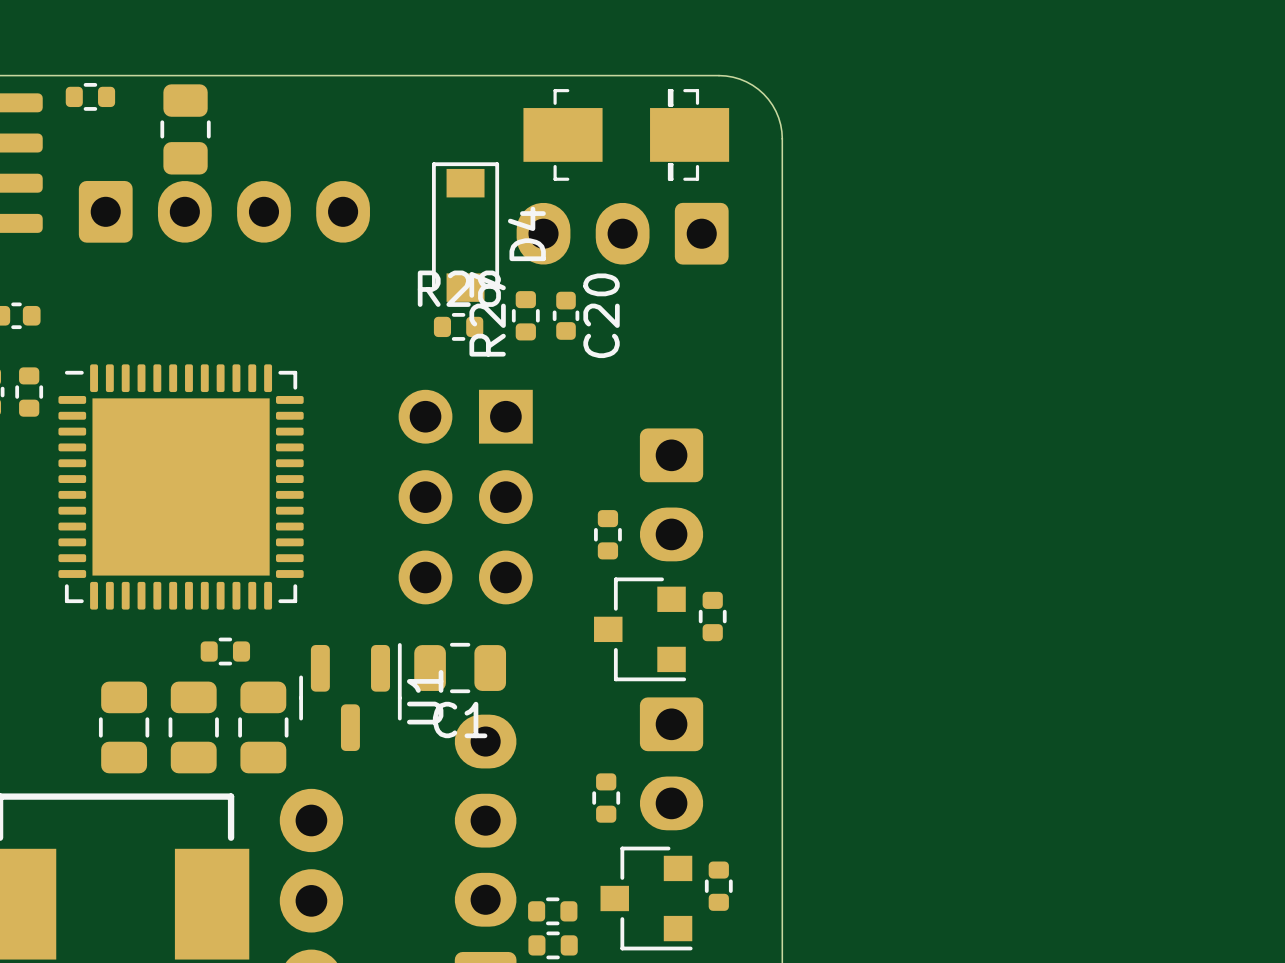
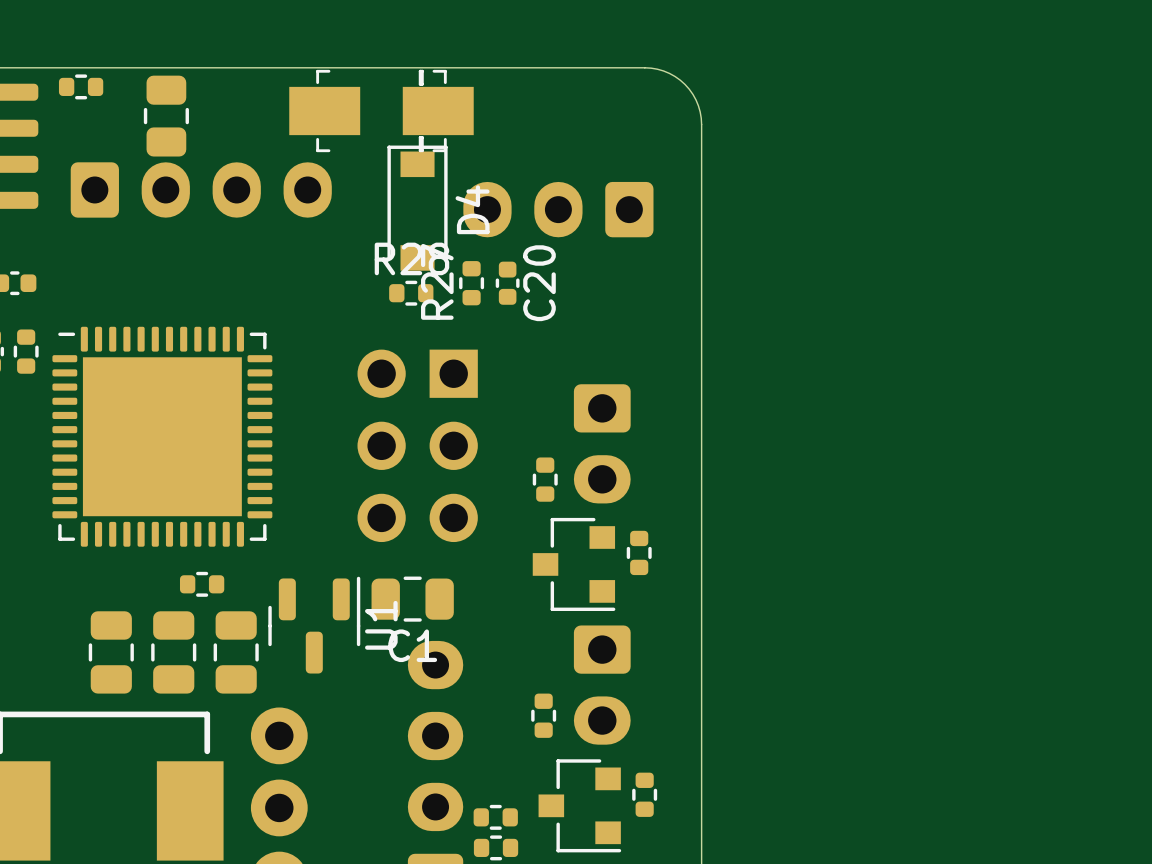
part position: (626, 134) -> (381, 110)

